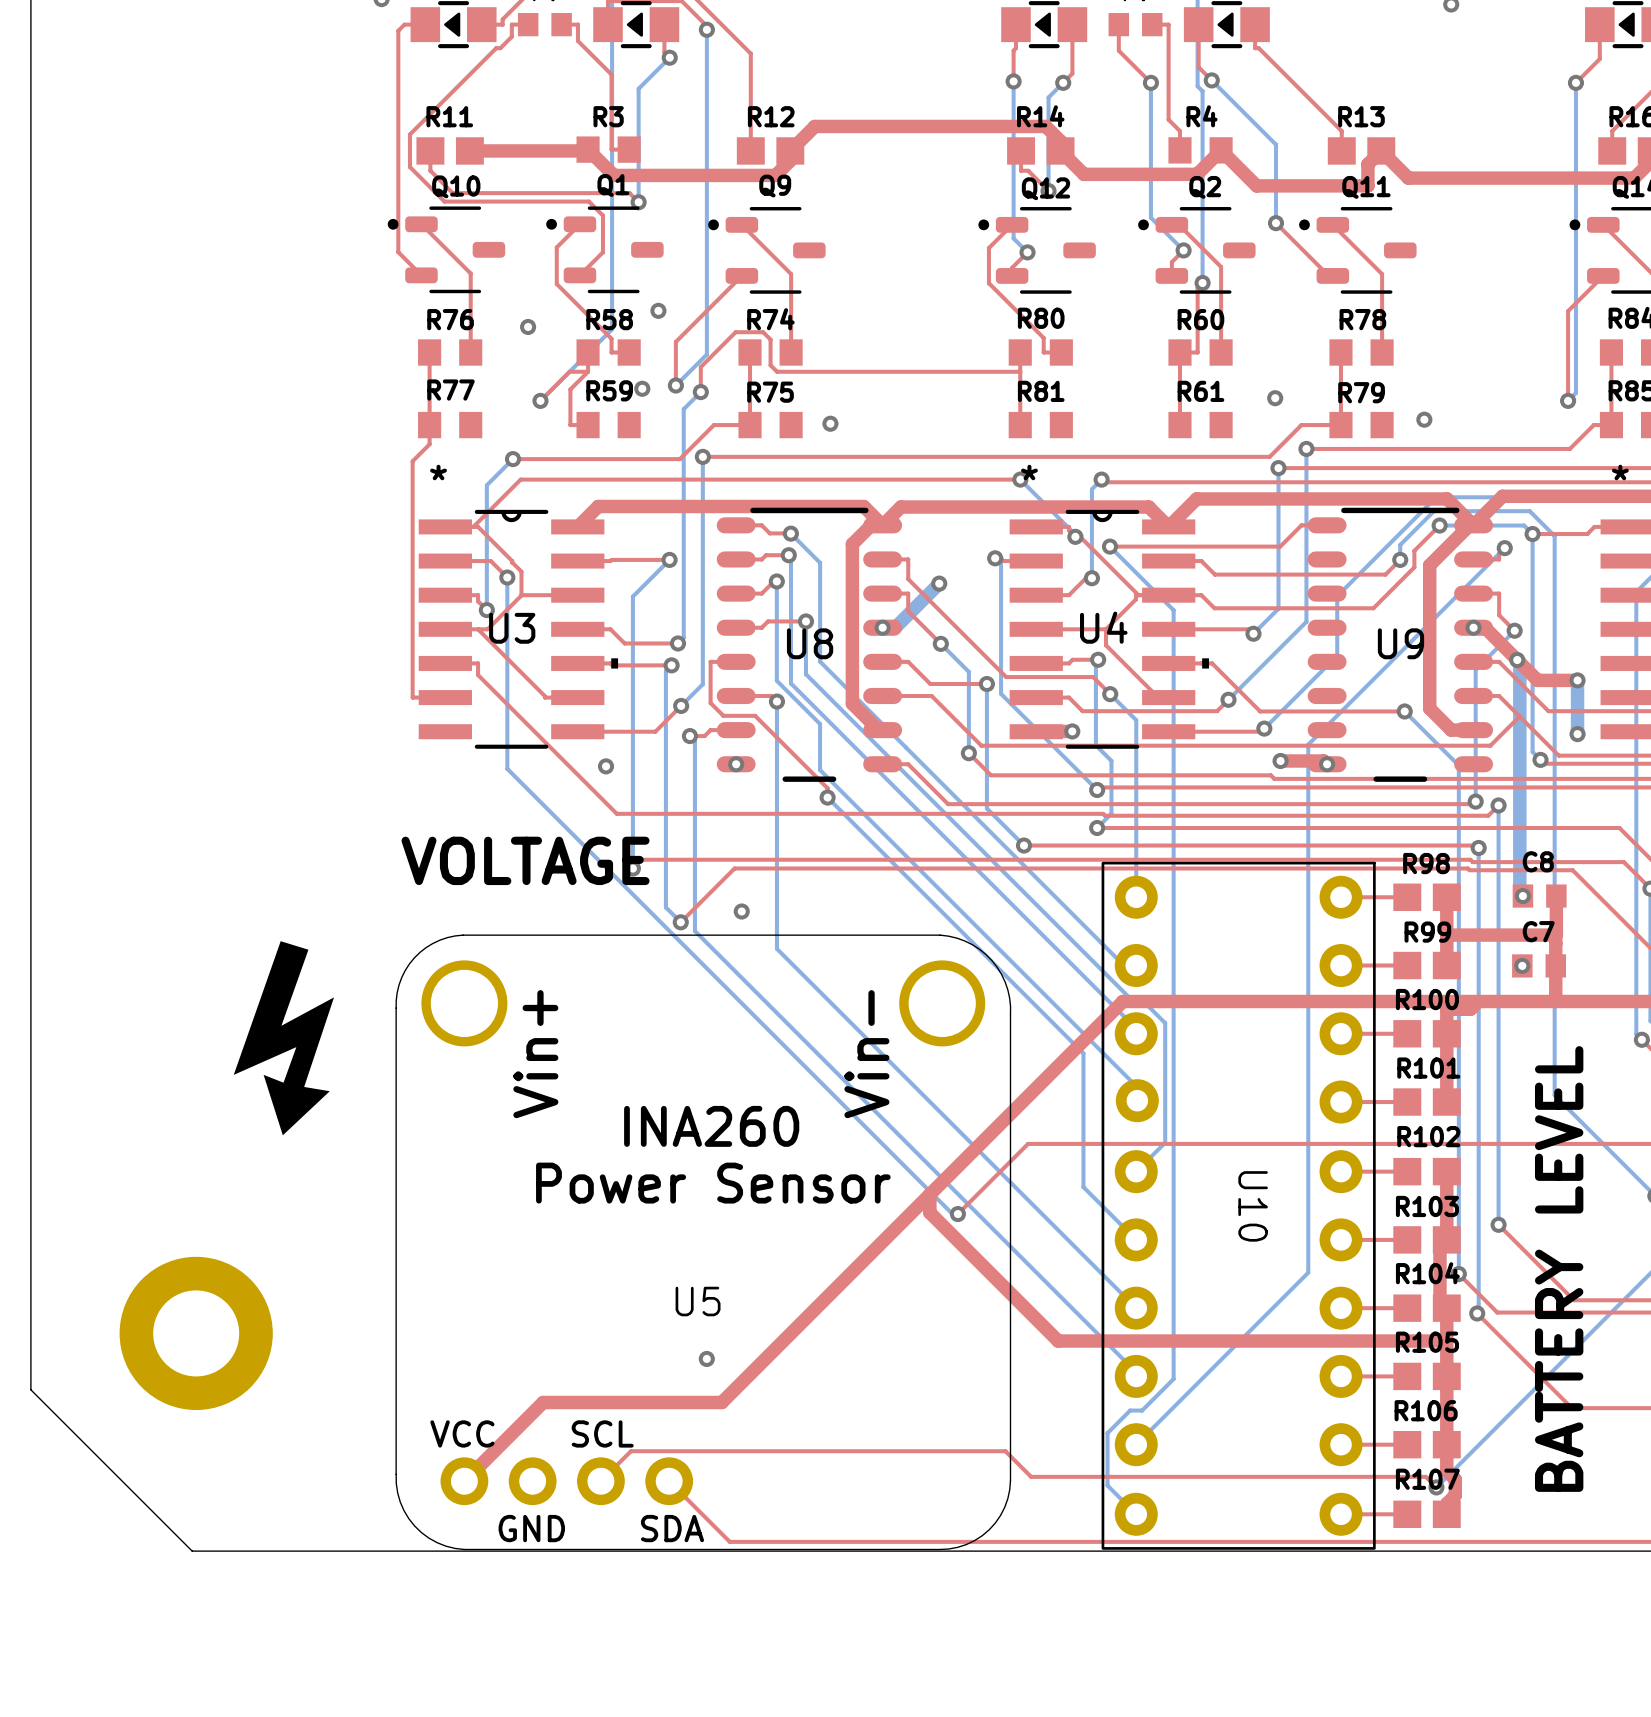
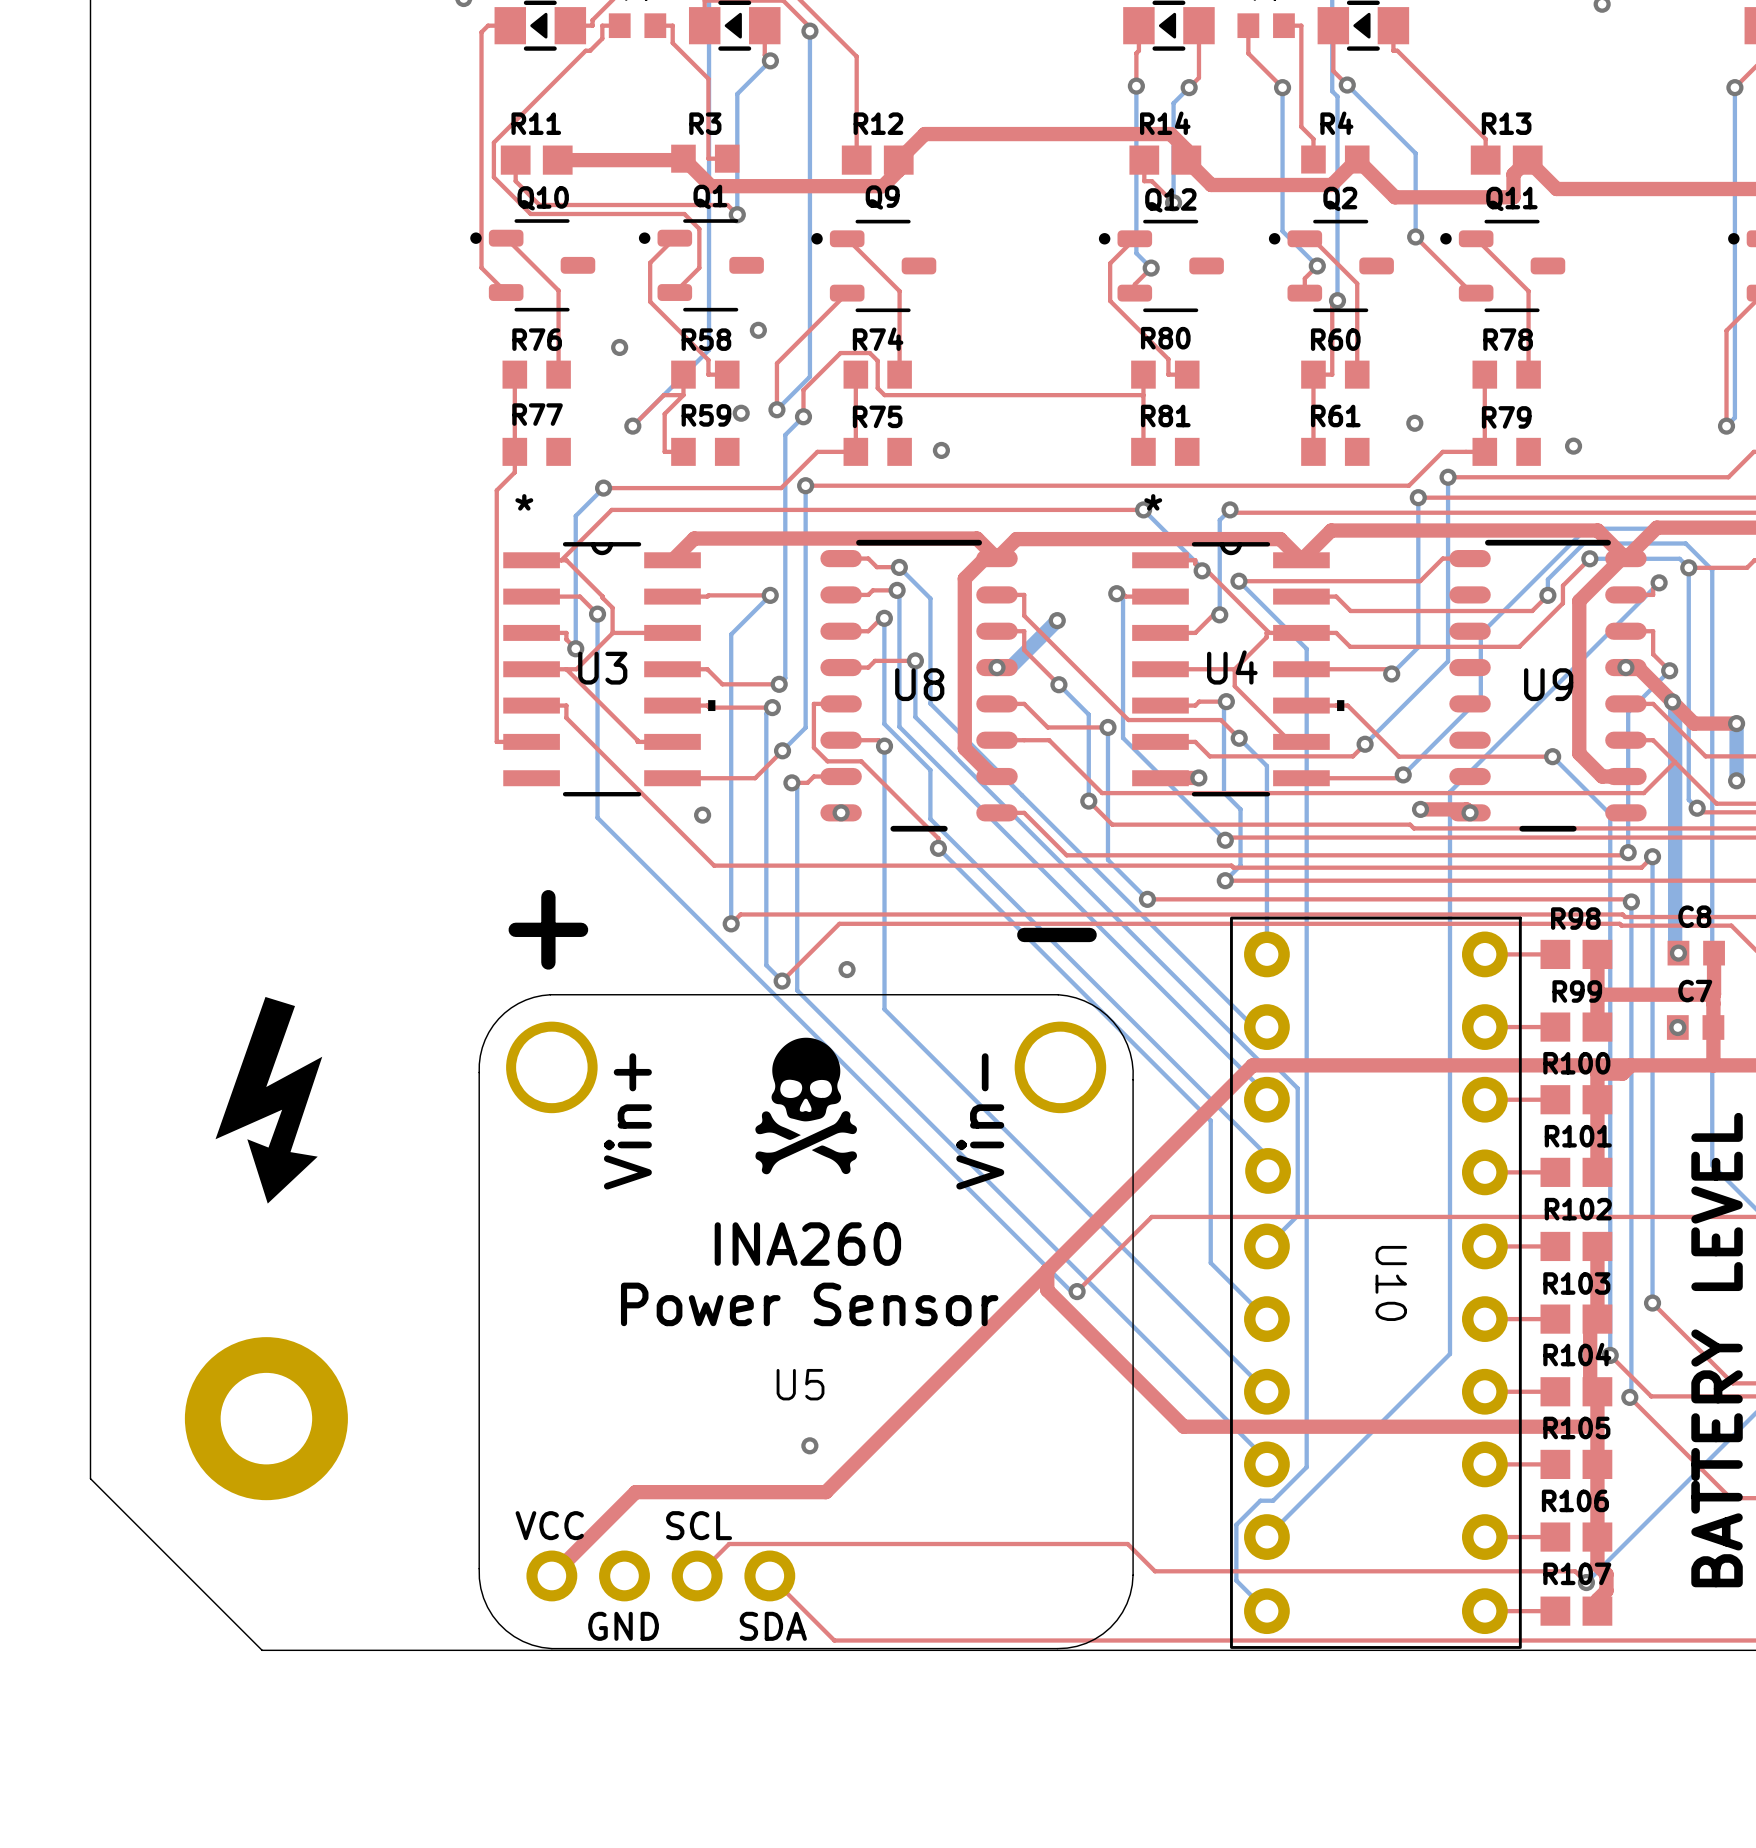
text: VOLTAGE (525, 860) -> none
text: none -> + (548, 929)
text: none -> - (1056, 934)
drawing: none -> [755, 1037, 857, 1175]
drawing position: (283, 1038) -> (268, 1100)
U5 text position: INA260 (711, 1126) -> INA260 (807, 1244)
U5 text position: Power Sensor (713, 1183) -> Power Sensor (809, 1304)

